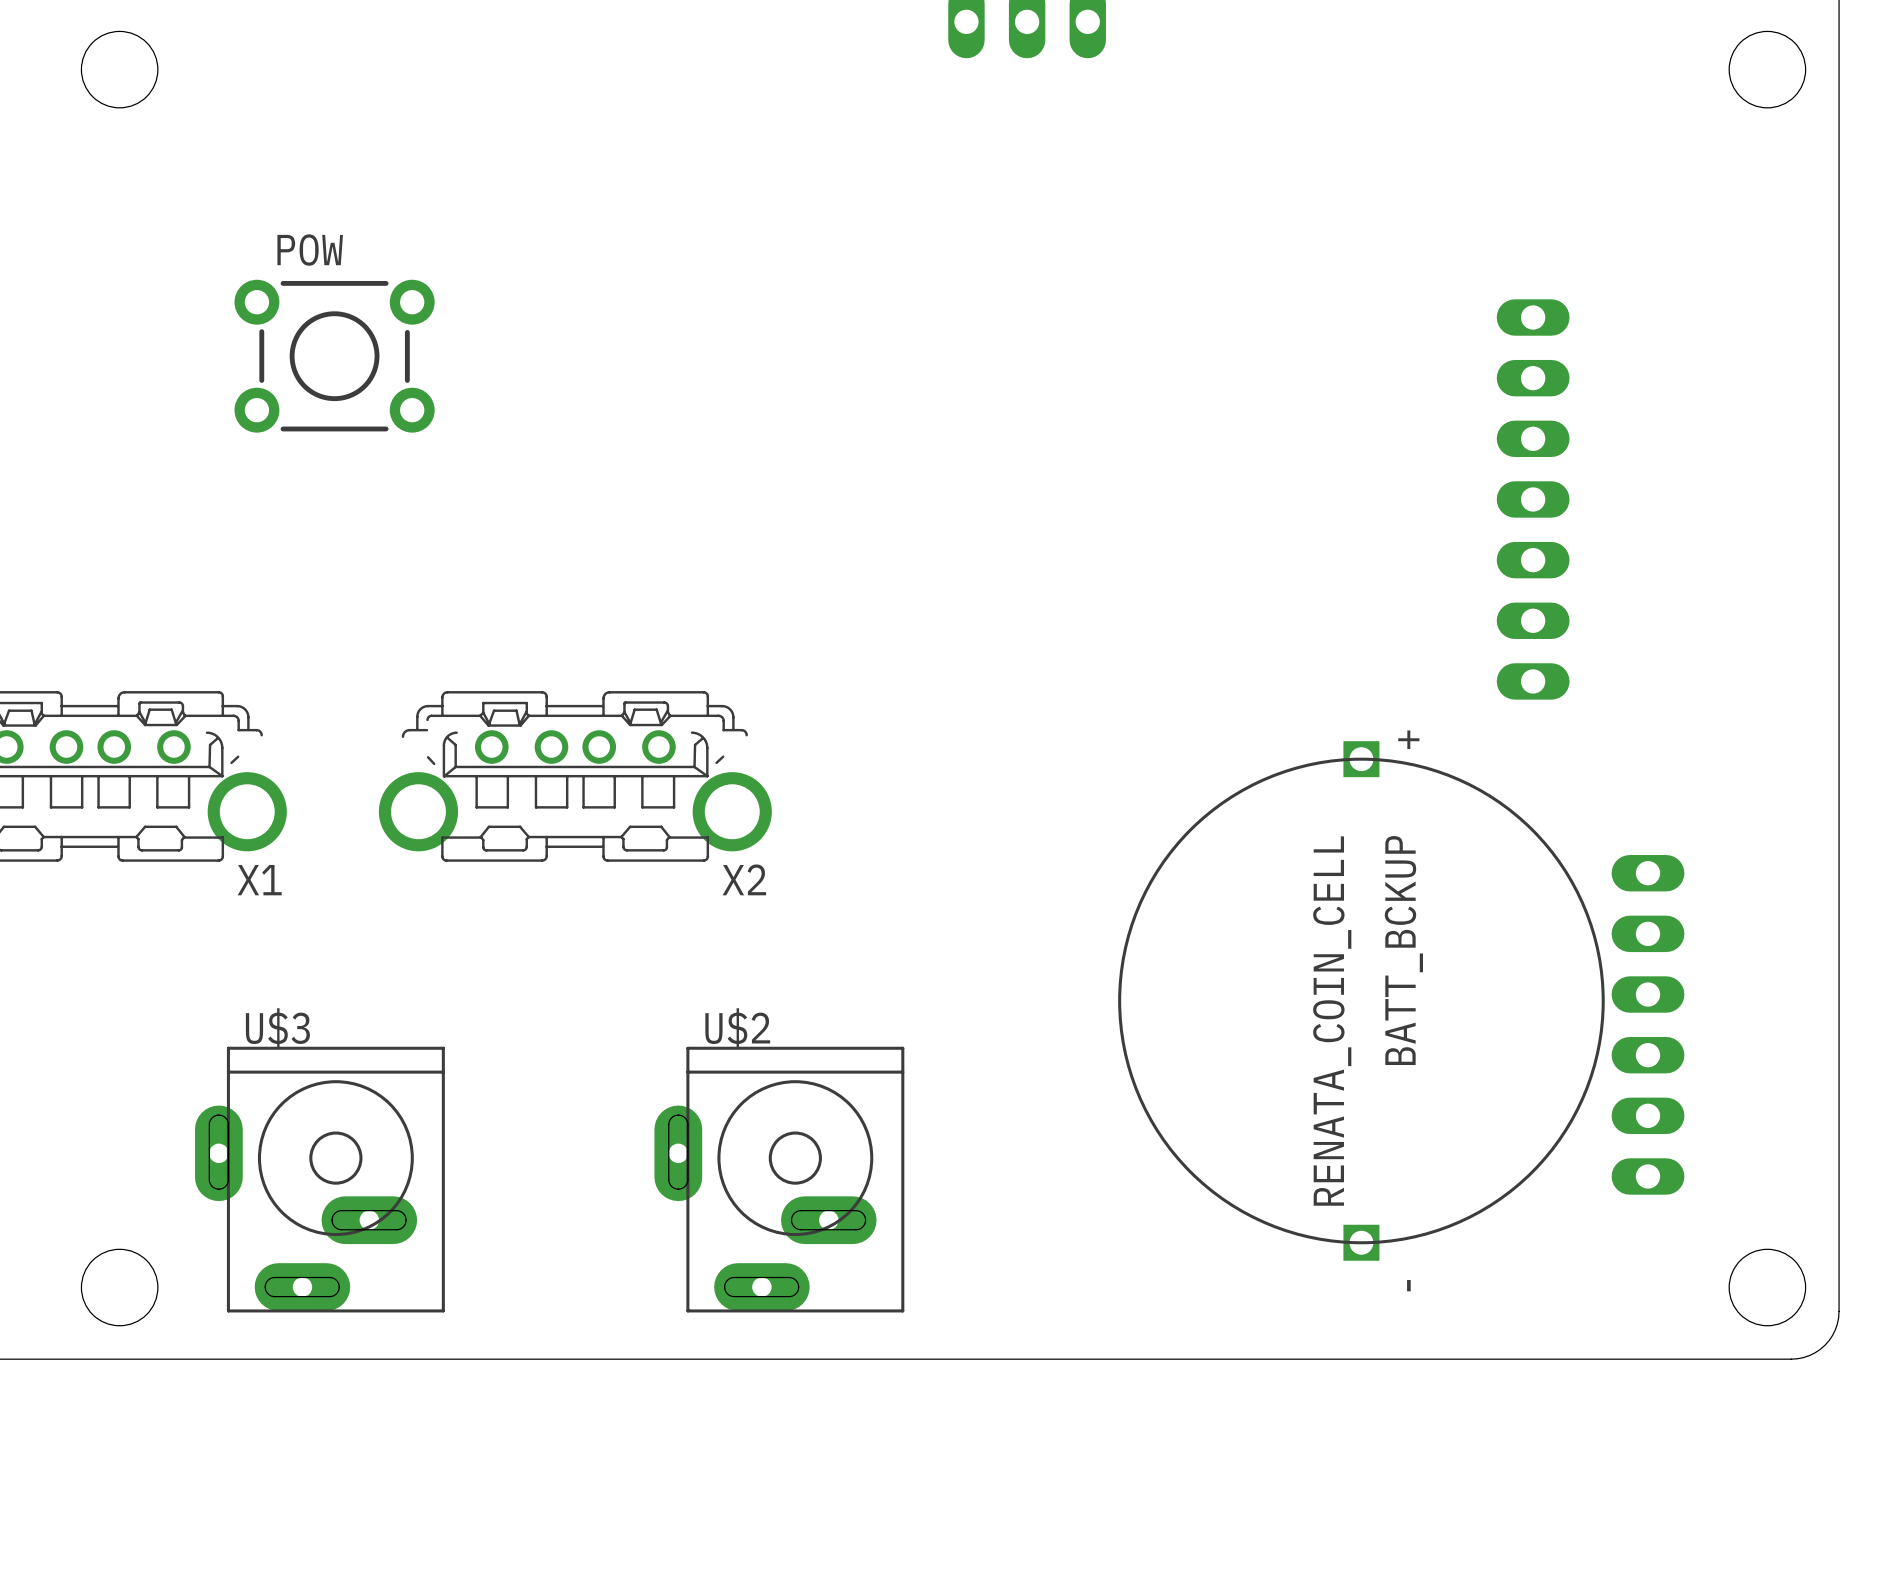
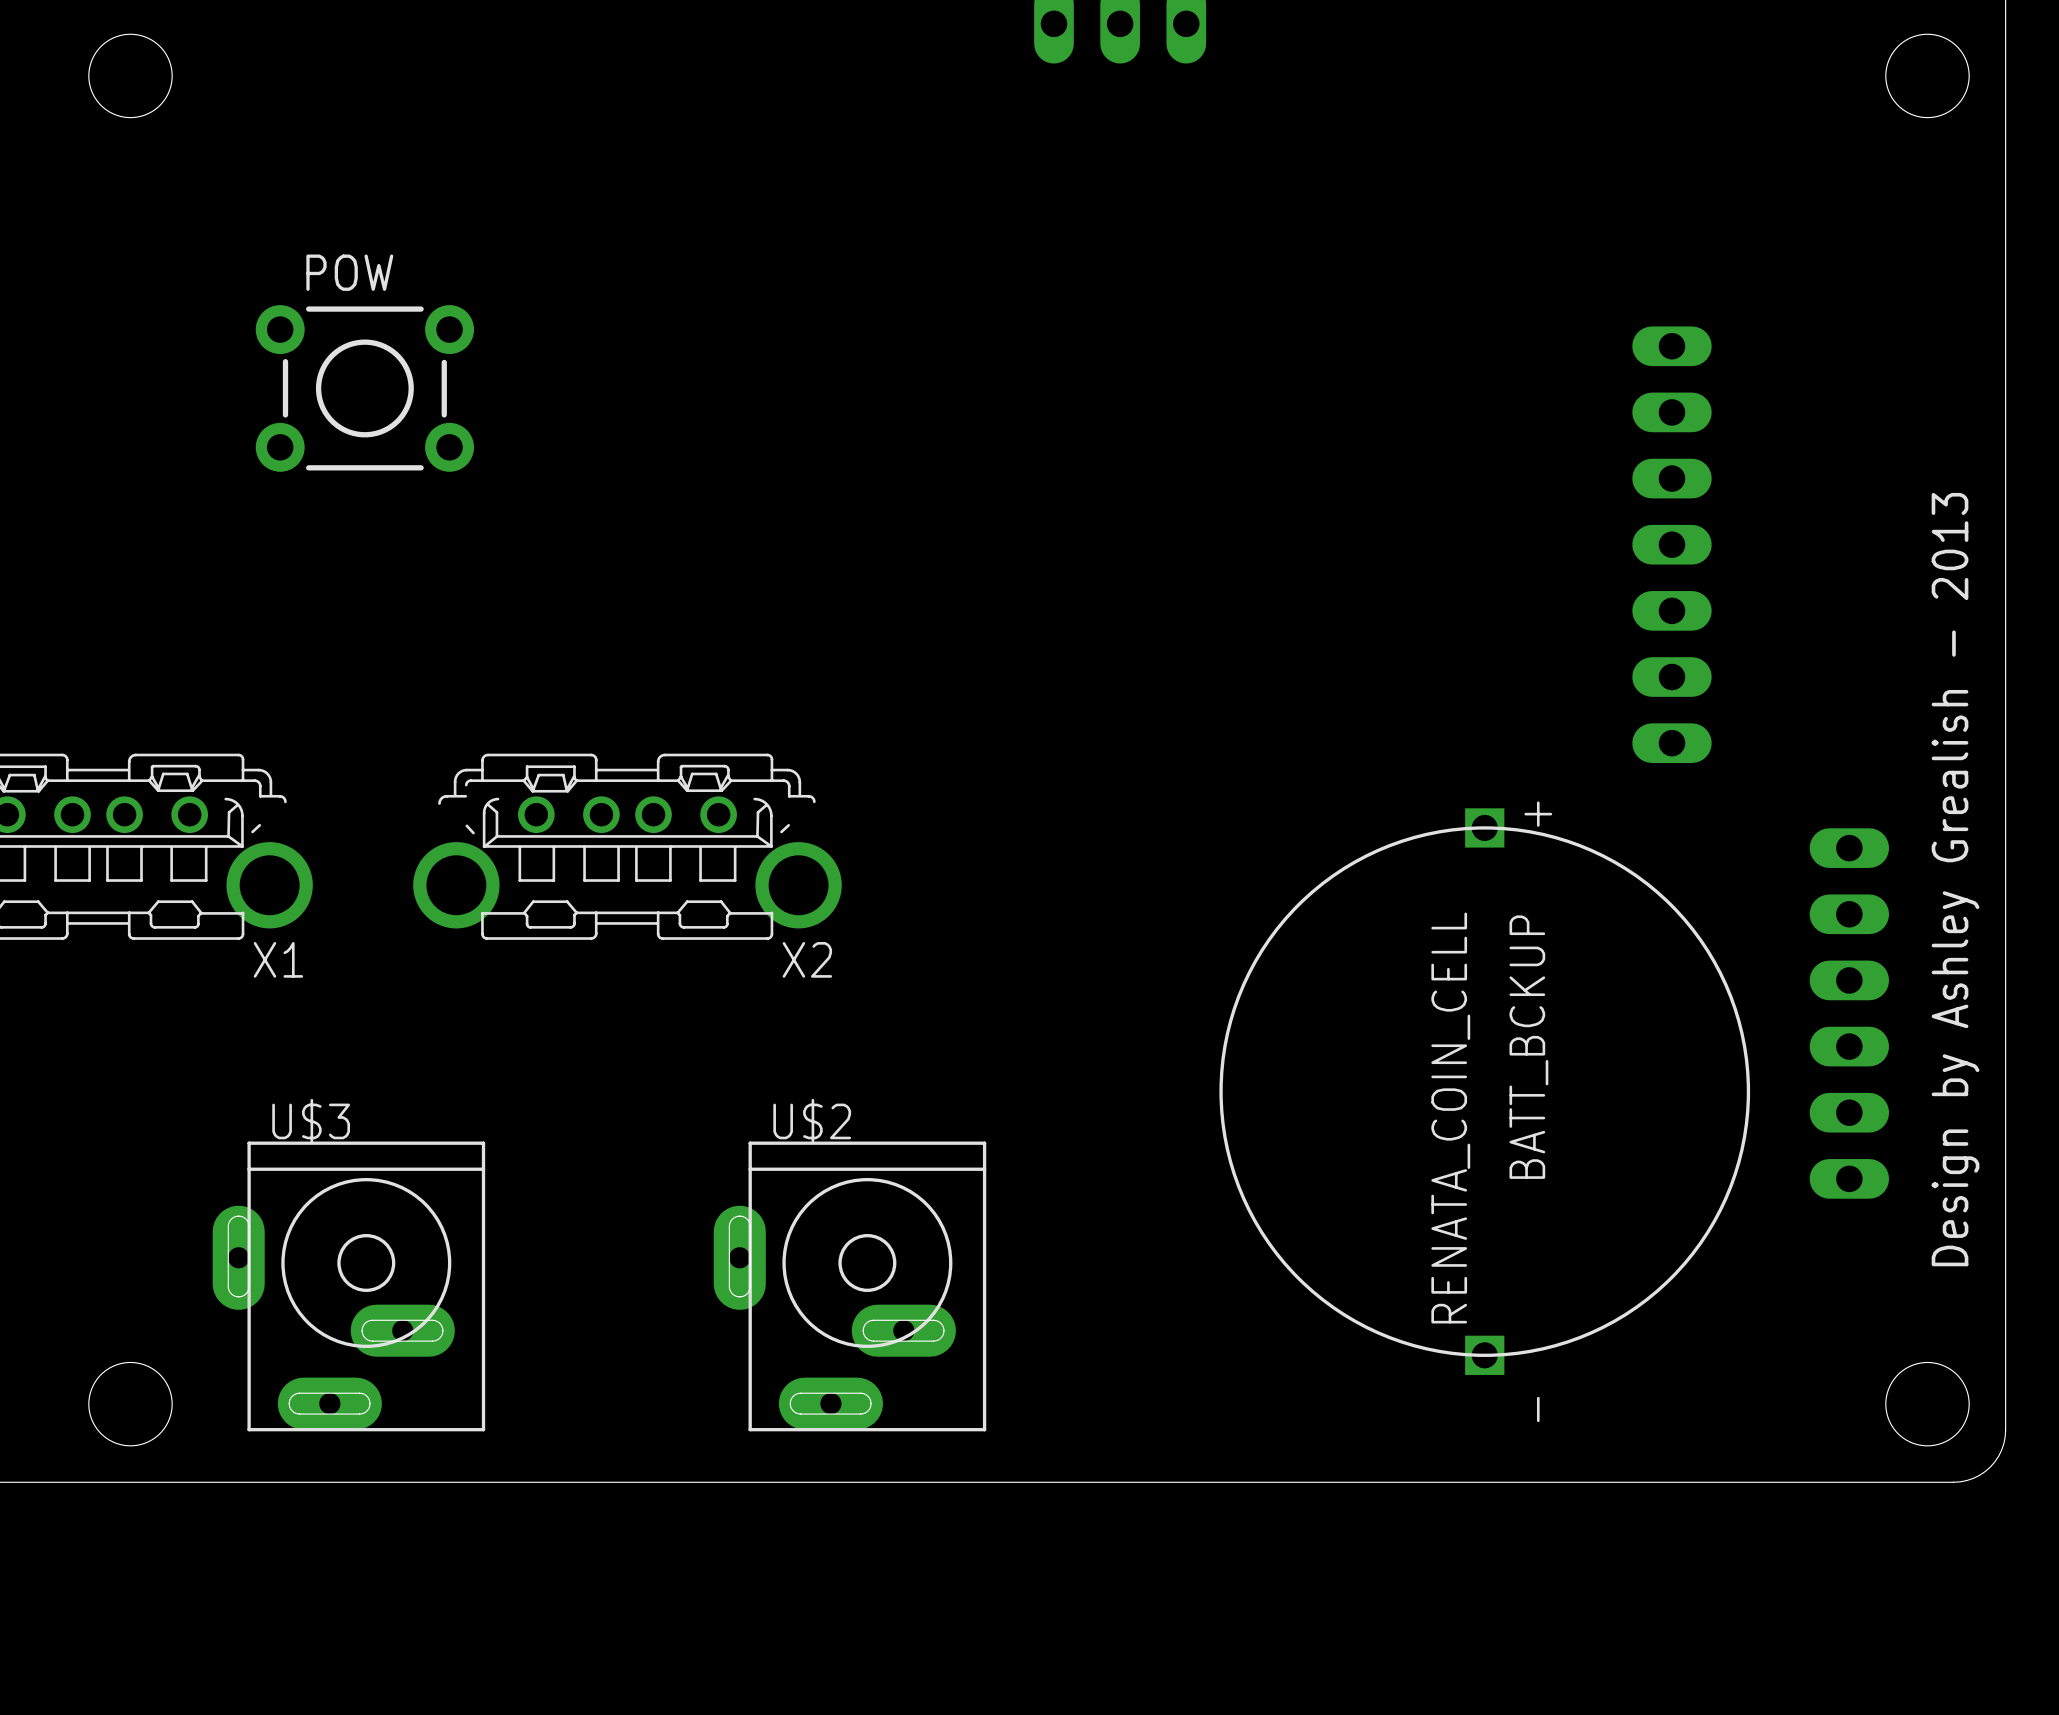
text: none -> Design by Ashley Grealish - 2013 (1955, 879)
part position: (1648, 1024) -> (1849, 1013)

